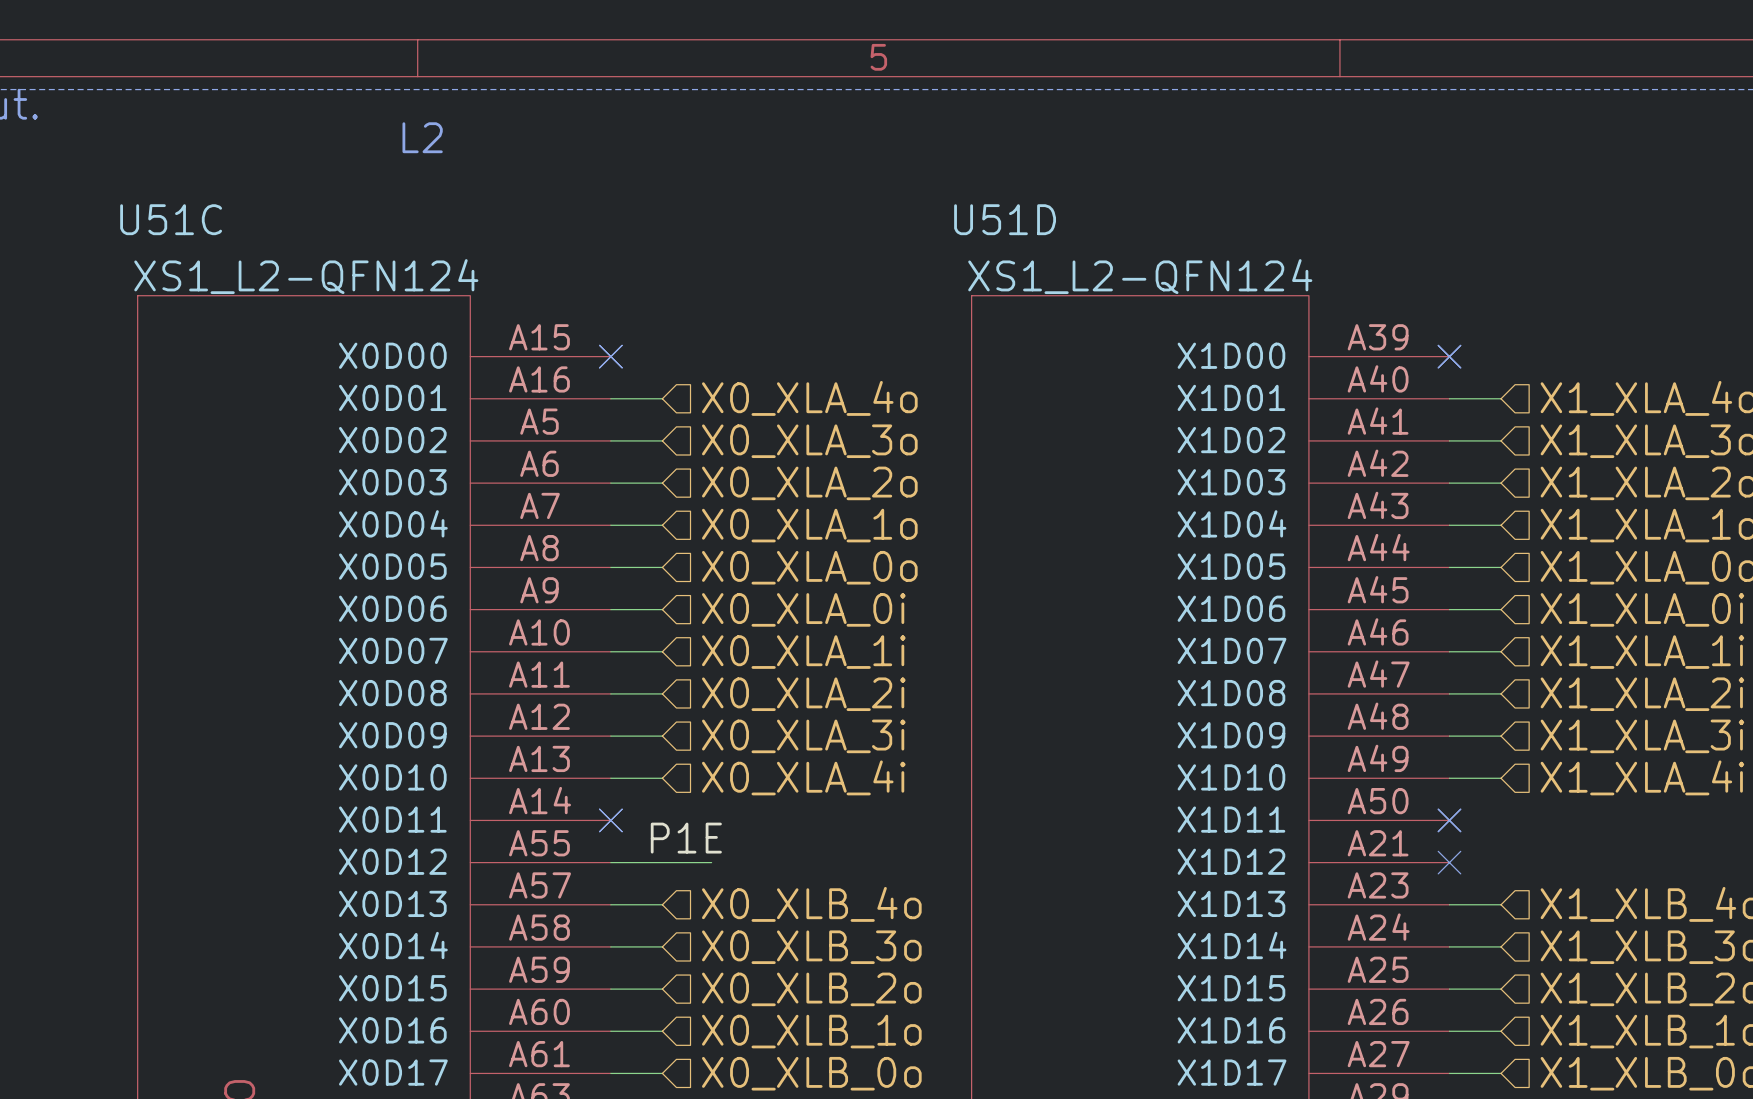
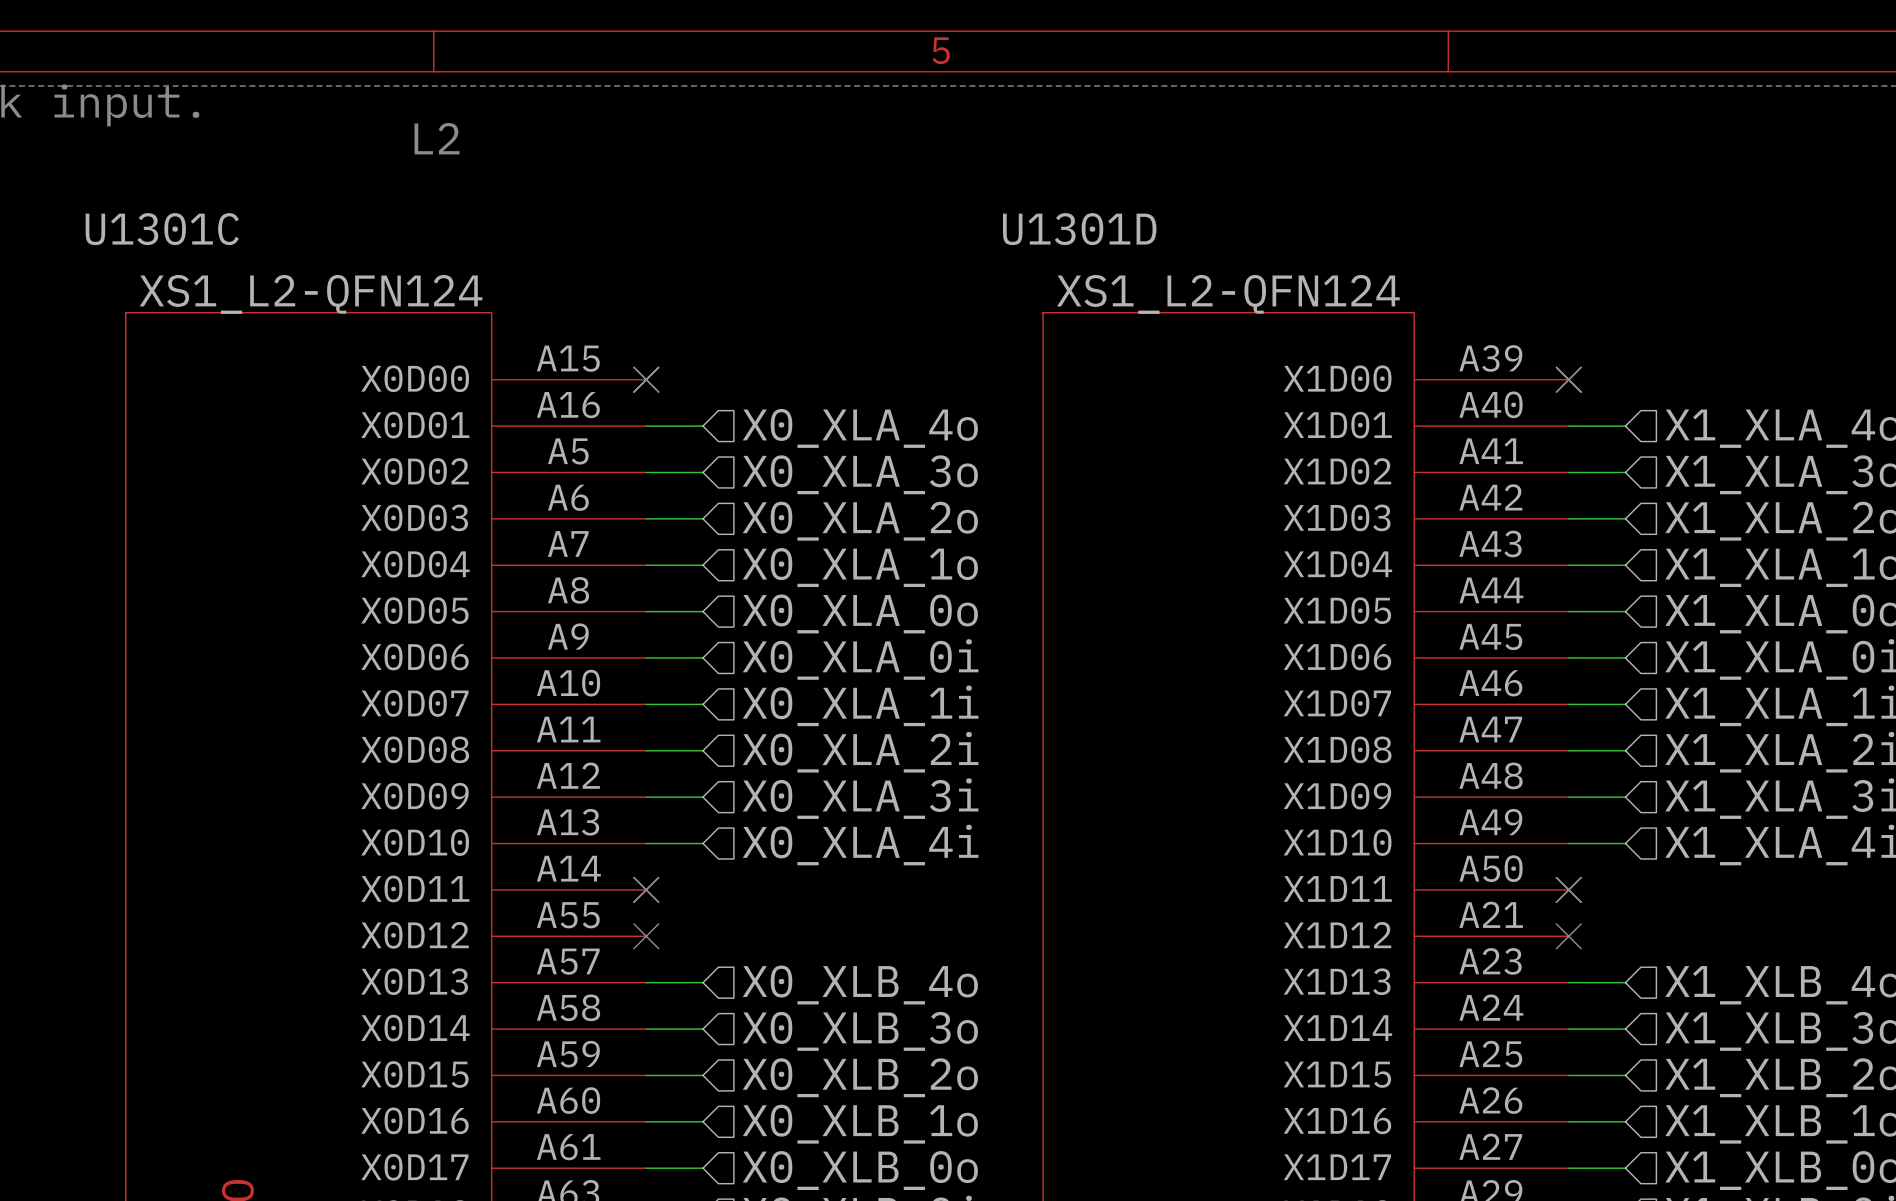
U51C name: U51C (171, 219) -> U1301C (162, 229)
U51D name: U51D (1005, 219) -> U1301D (1079, 229)
label: P1E (686, 838) -> none
wire: (610, 862) (711, 862) -> none
no-connect mark: none -> (646, 936)

